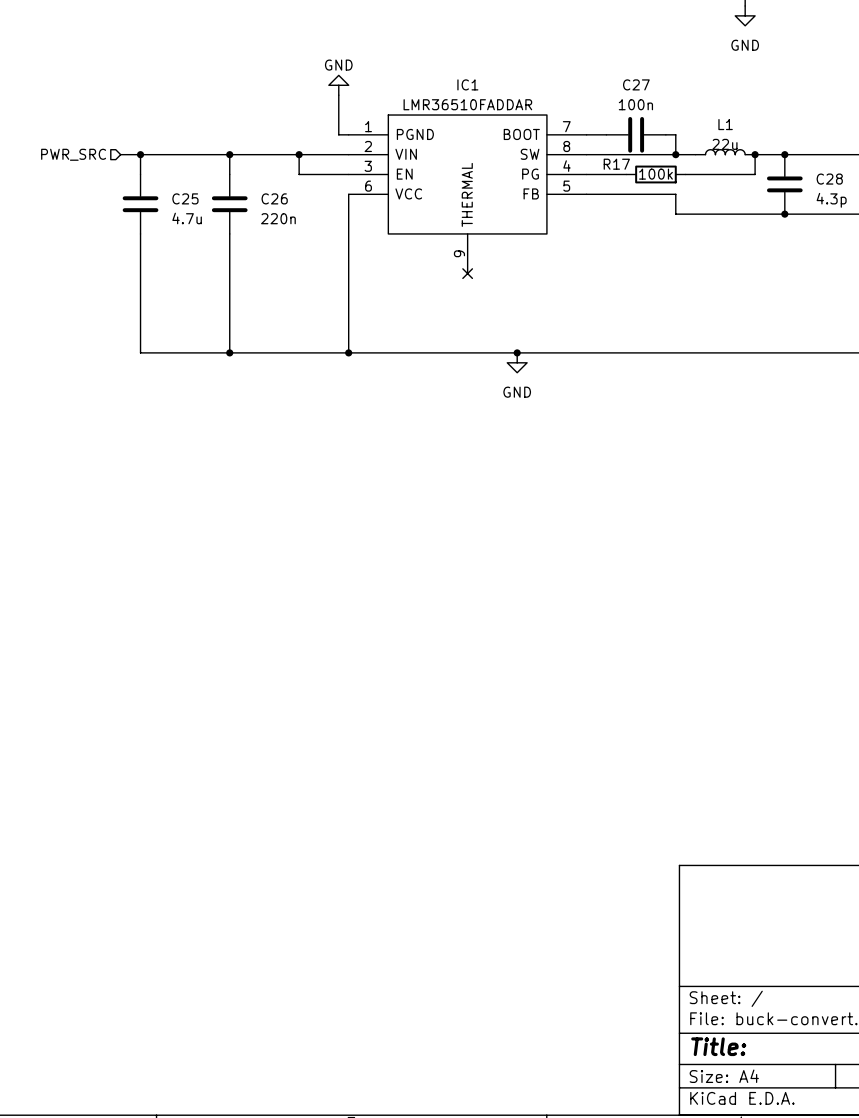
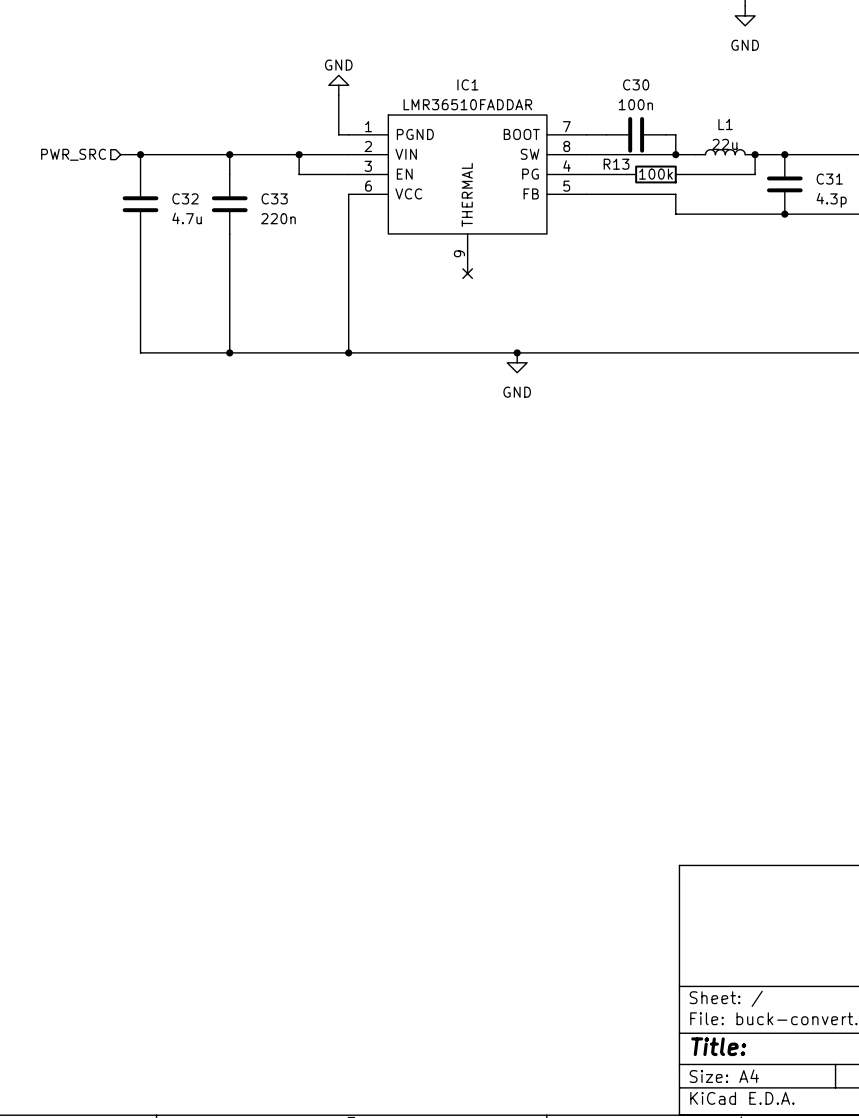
C27 name: C27 (636, 84) -> C30 (636, 84)
R17 name: R17 (616, 164) -> R13 (616, 164)
C28 name: C28 (829, 179) -> C31 (829, 179)
C25 name: C25 (185, 198) -> C32 (185, 198)
C26 name: C26 (274, 198) -> C33 (274, 198)

